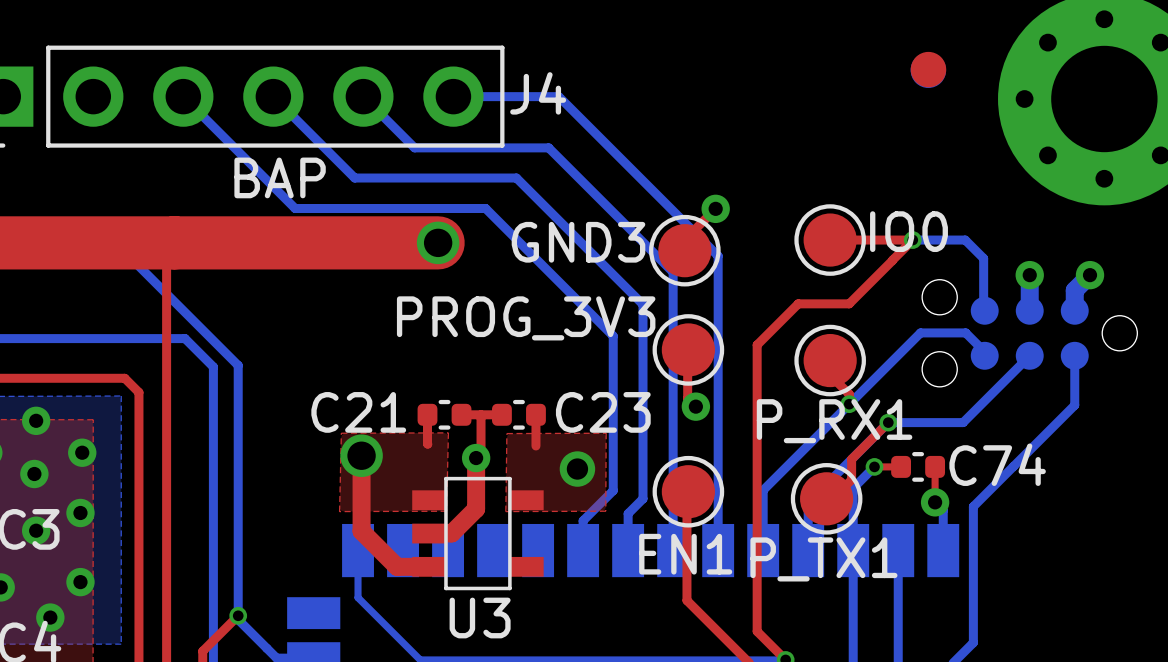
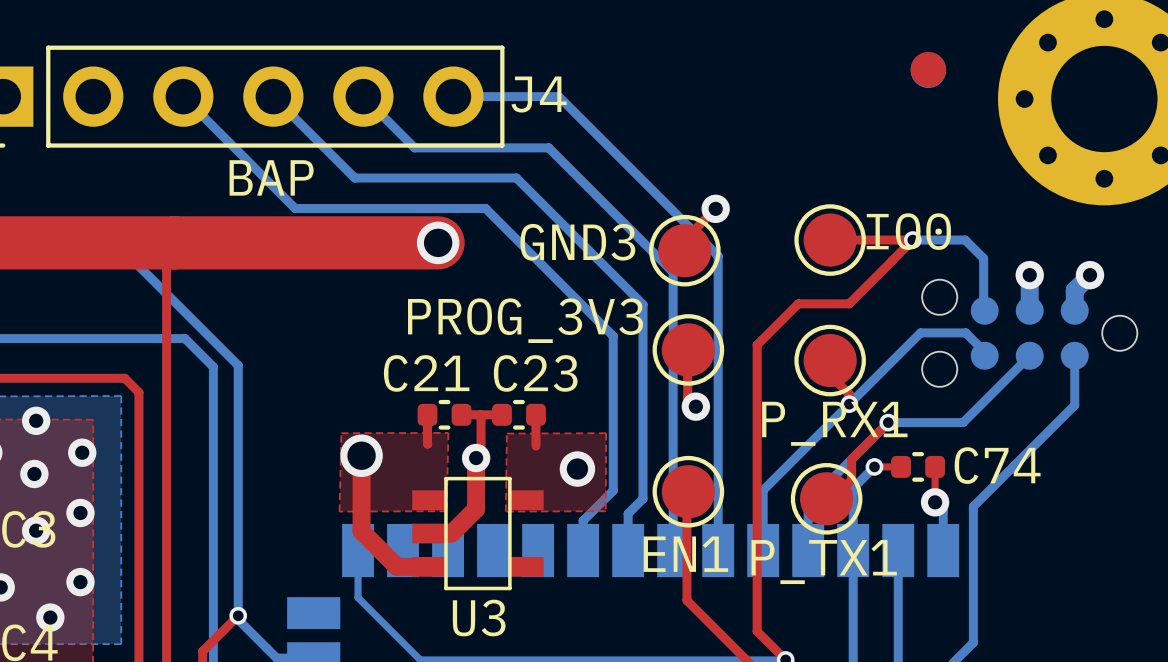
C21 name position: C21 (358, 412) -> C21 (426, 373)
C23 name position: C23 (603, 412) -> C23 (535, 373)

